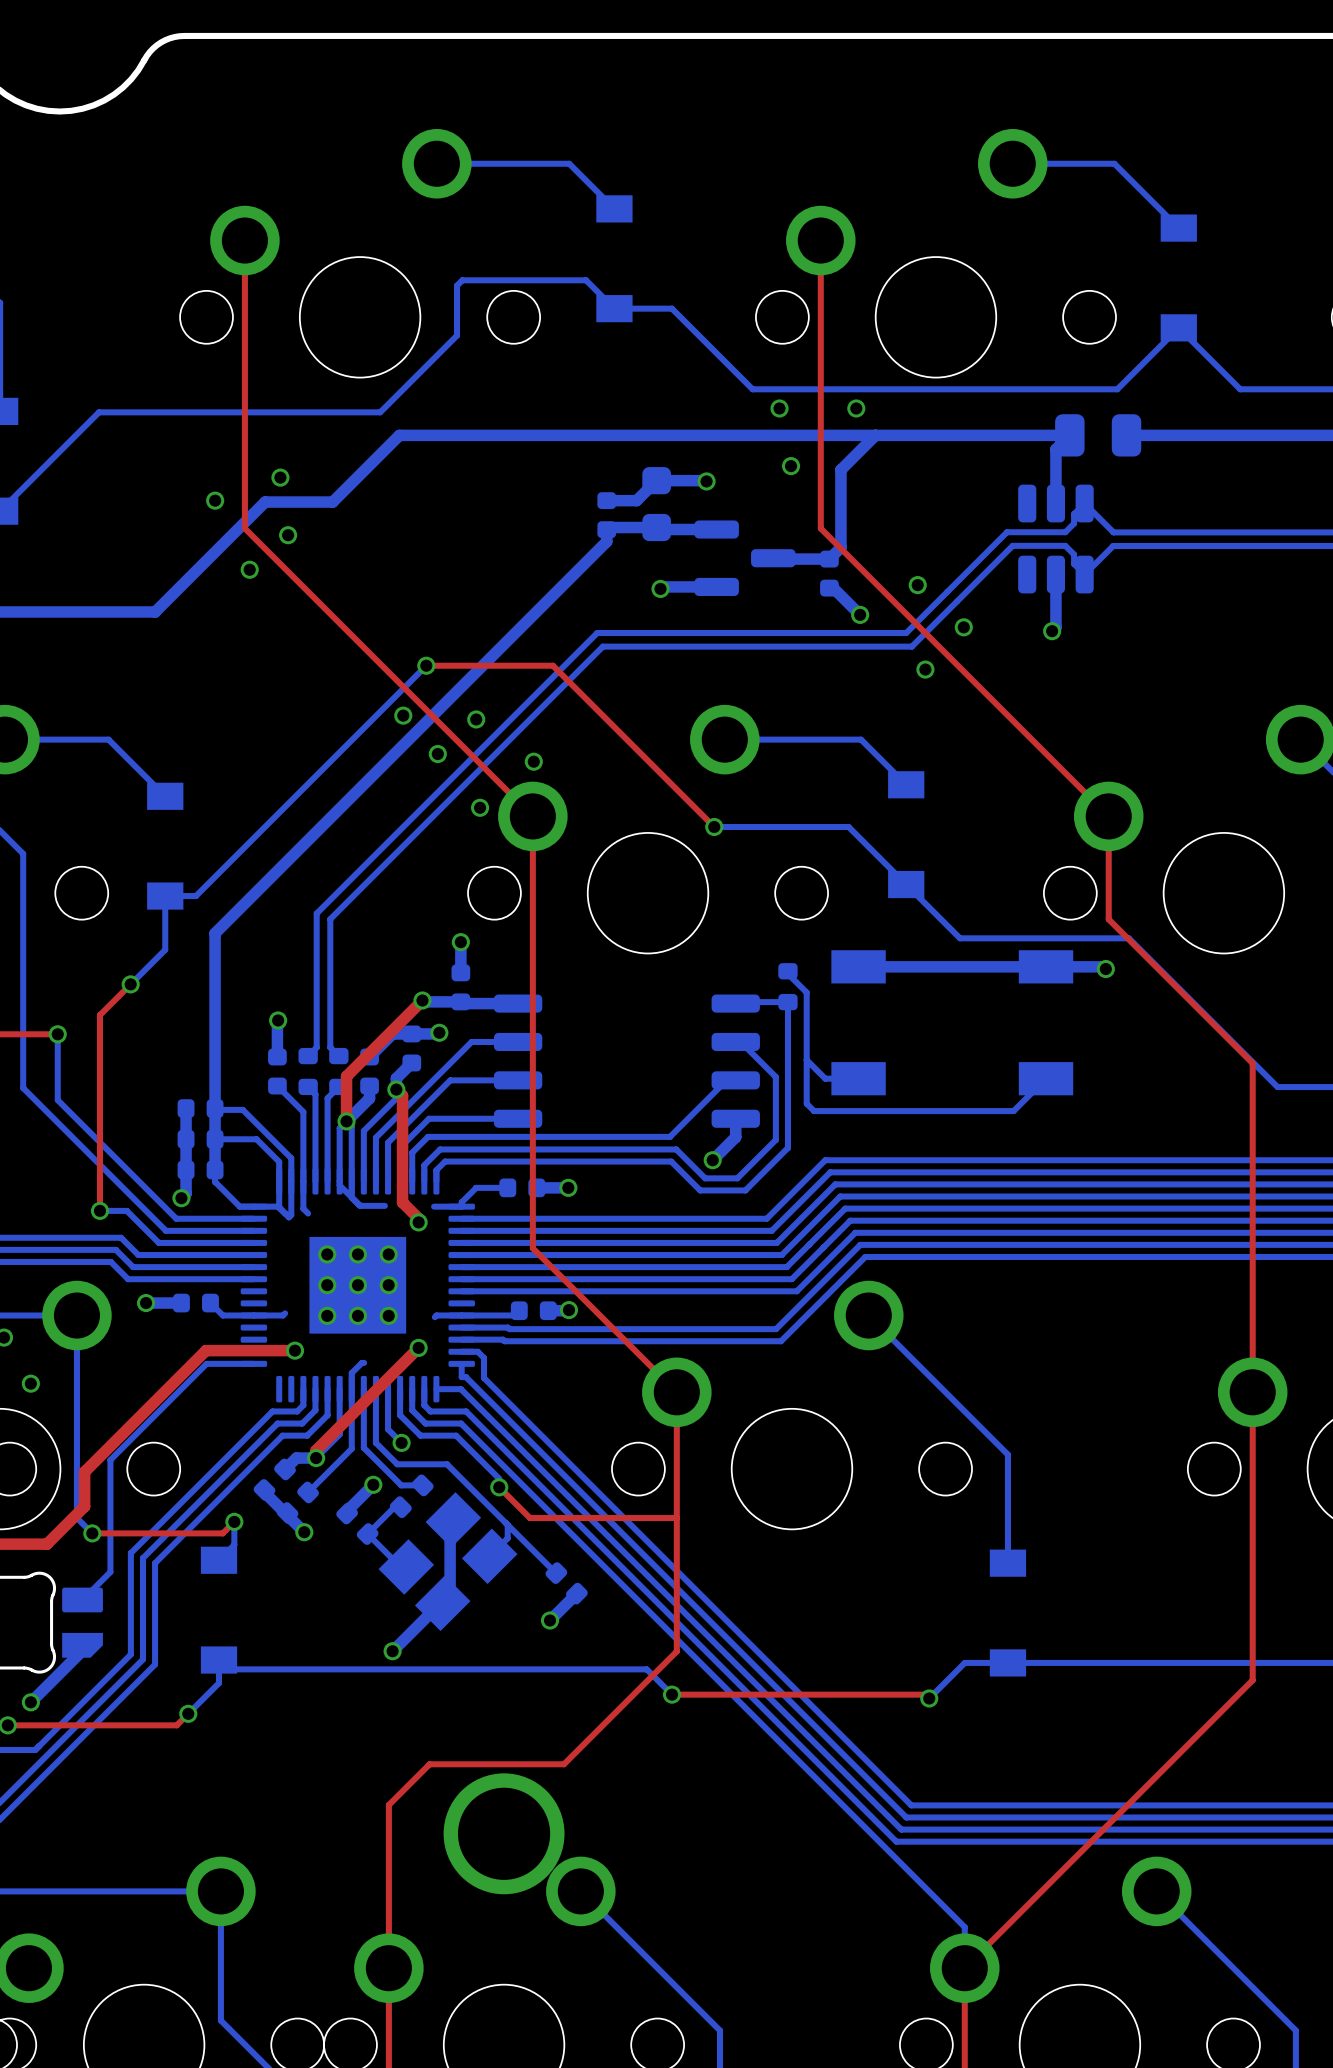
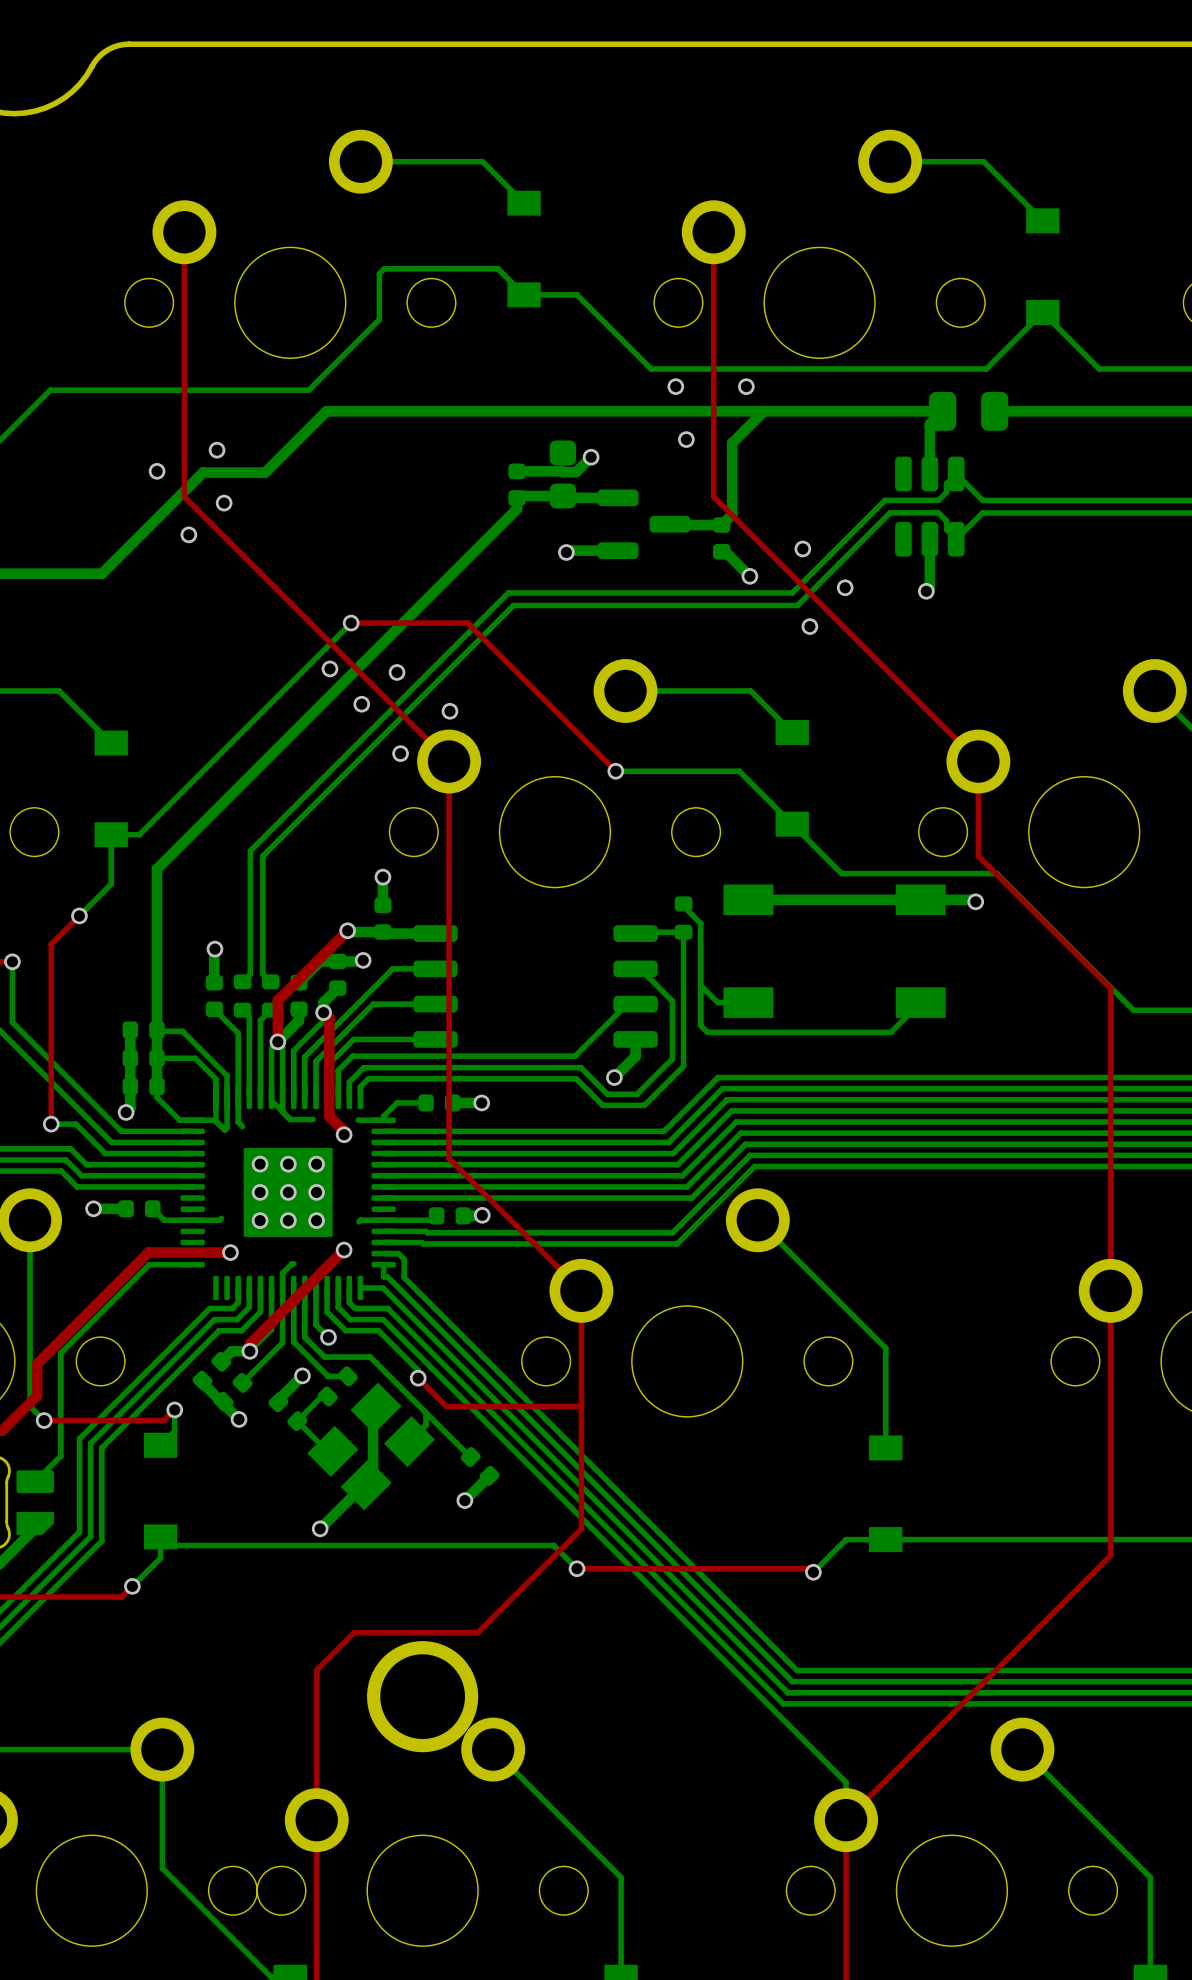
bottom track: (706, 481) (656, 480) (636, 500) -> (591, 457) (576, 472) (544, 471)
via position: (706, 481) -> (591, 457)

